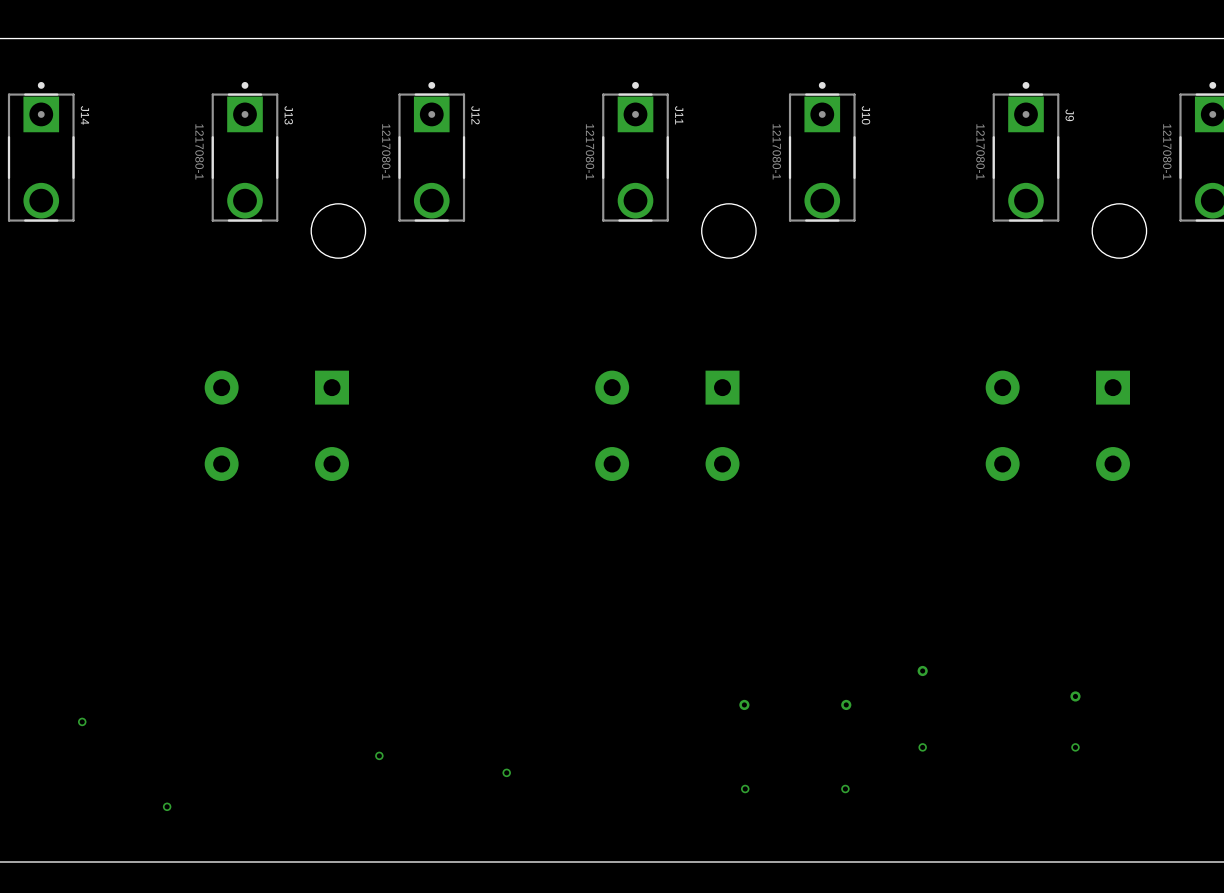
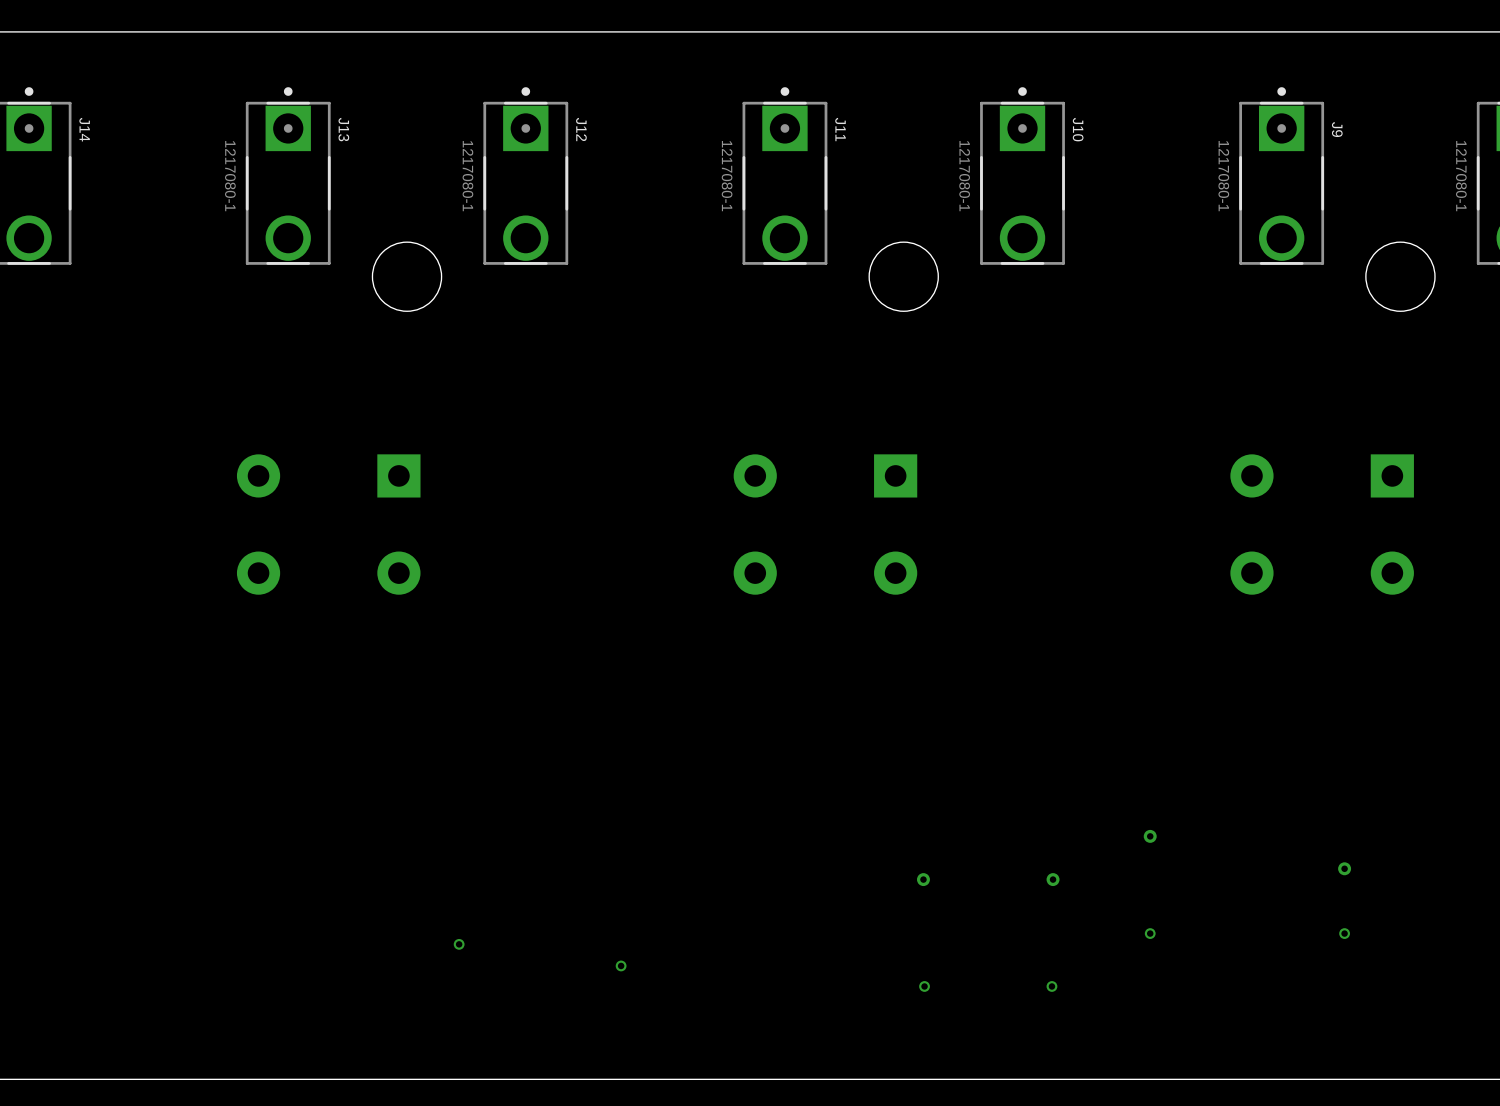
via: (82, 721) -> none
via: (167, 806) -> none

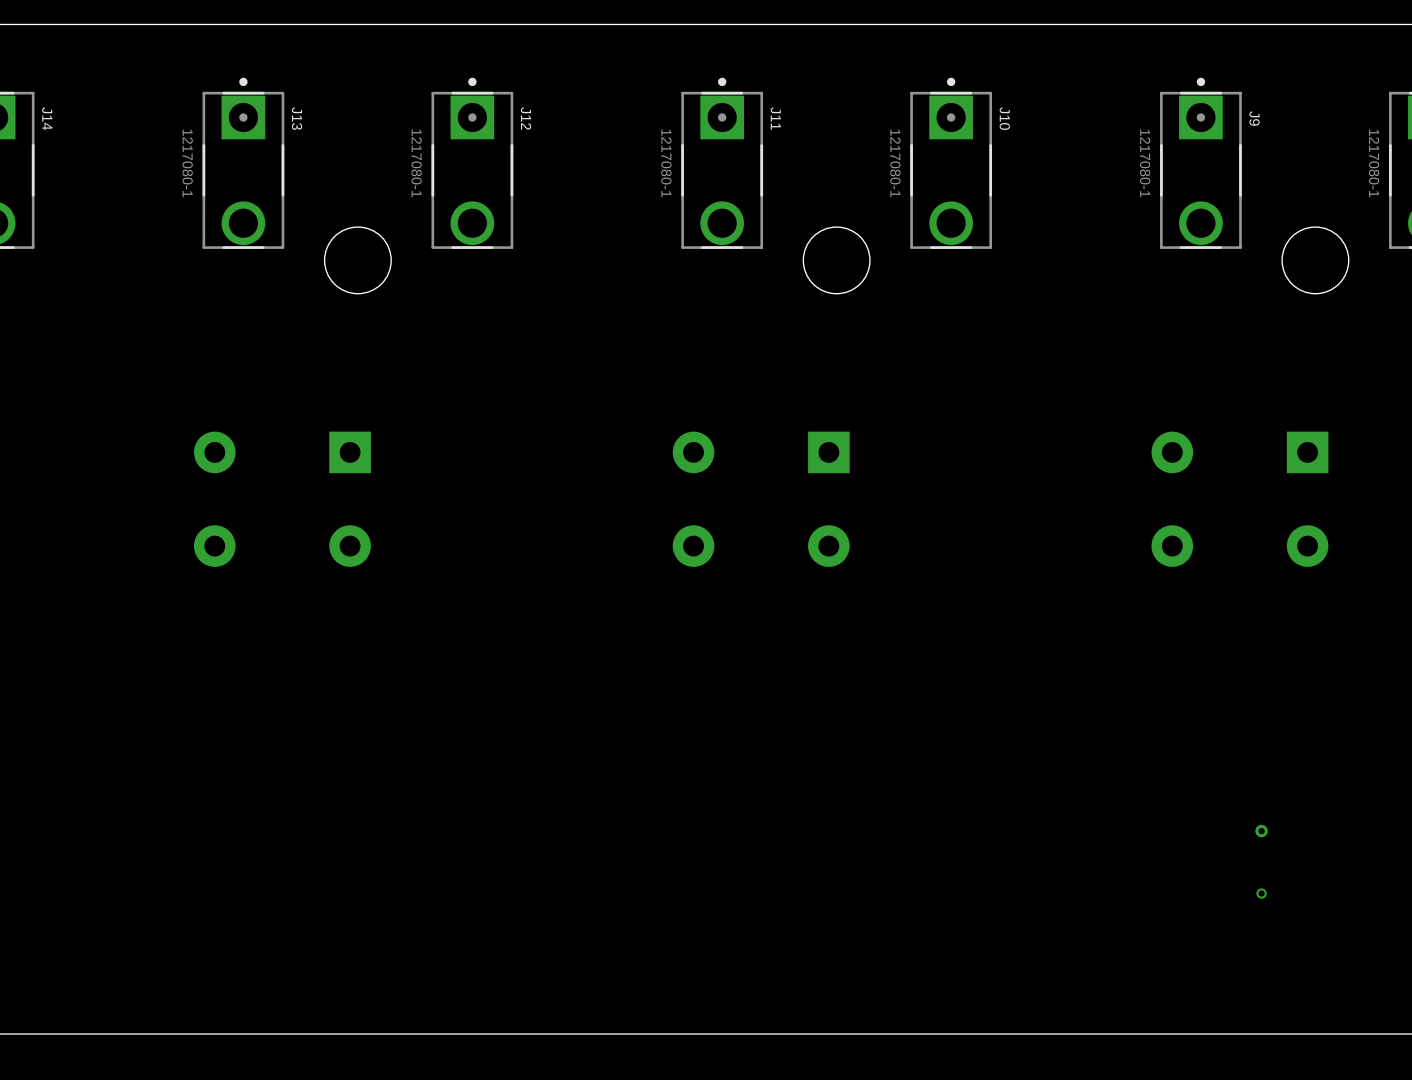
via: (1150, 836) -> none
via: (923, 879) -> none
via: (1053, 879) -> none
via: (1150, 933) -> none
via: (459, 944) -> none
via: (621, 965) -> none
via: (924, 986) -> none
via: (1051, 986) -> none

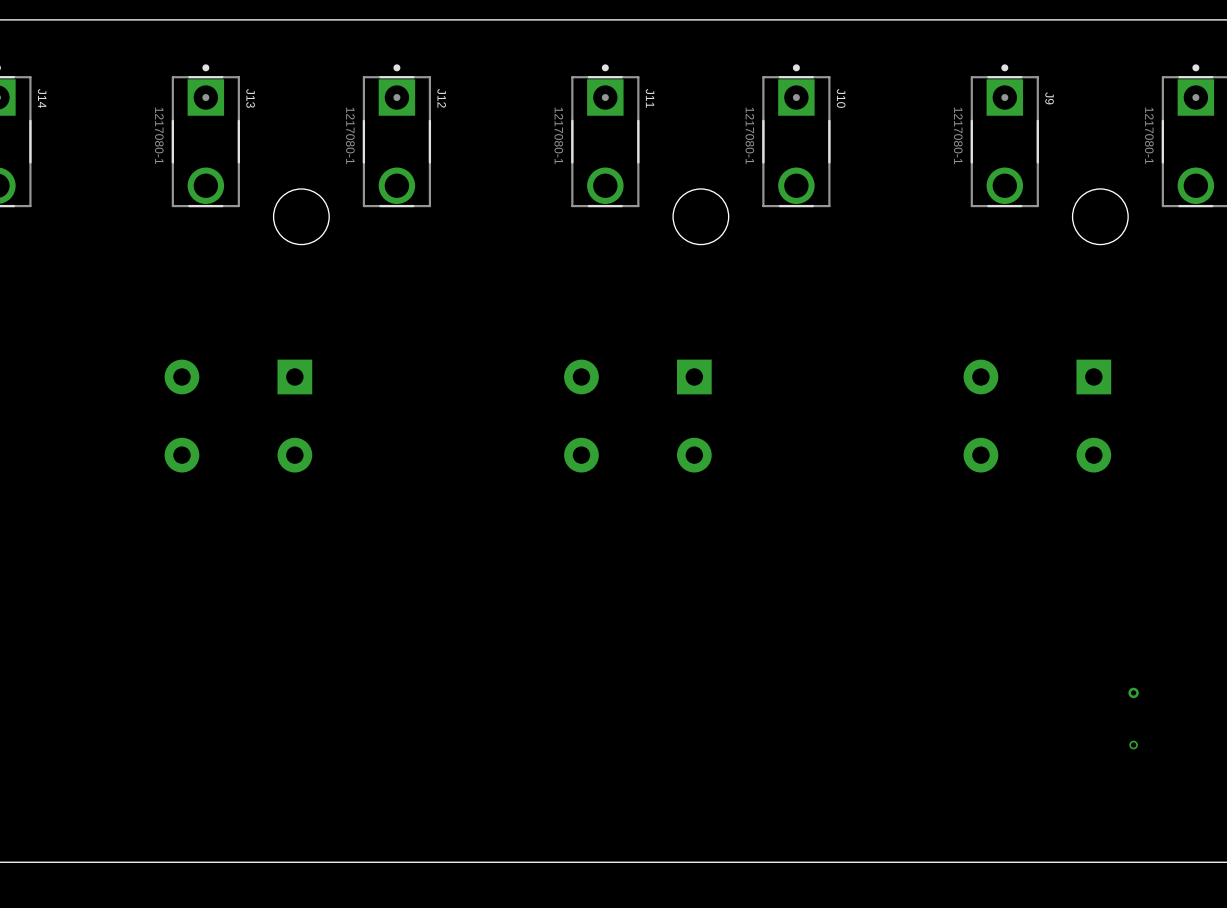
via position: (1261, 831) -> (1133, 692)
via position: (1261, 893) -> (1133, 745)

